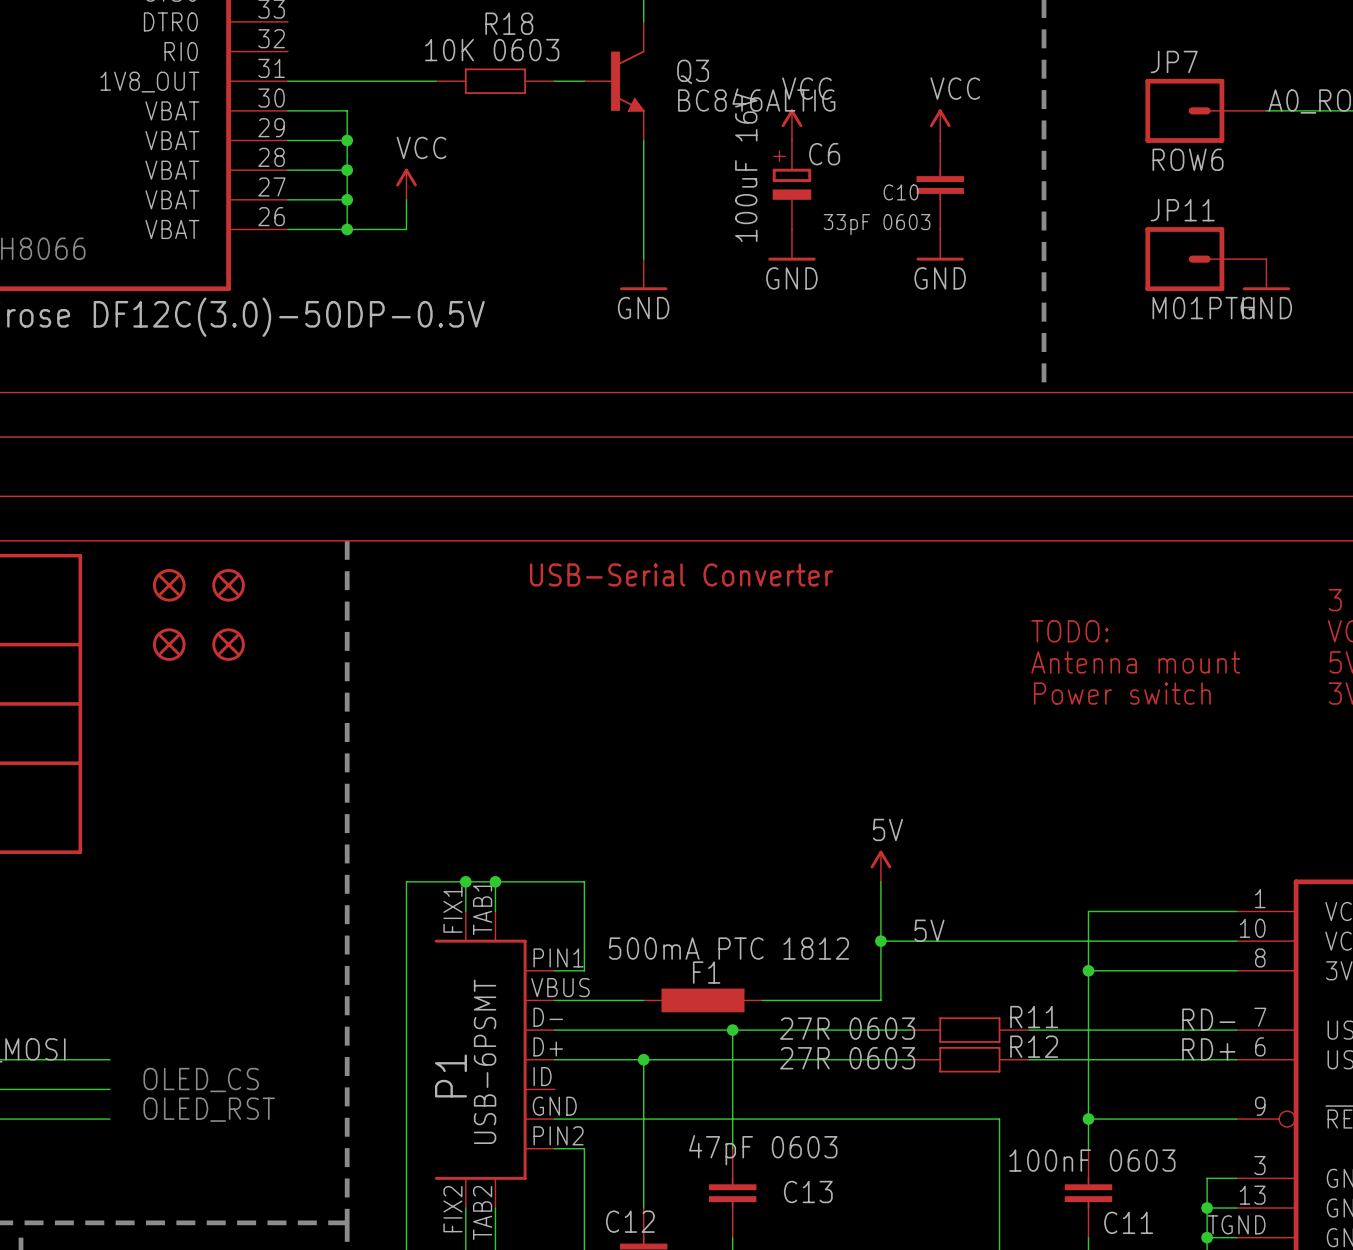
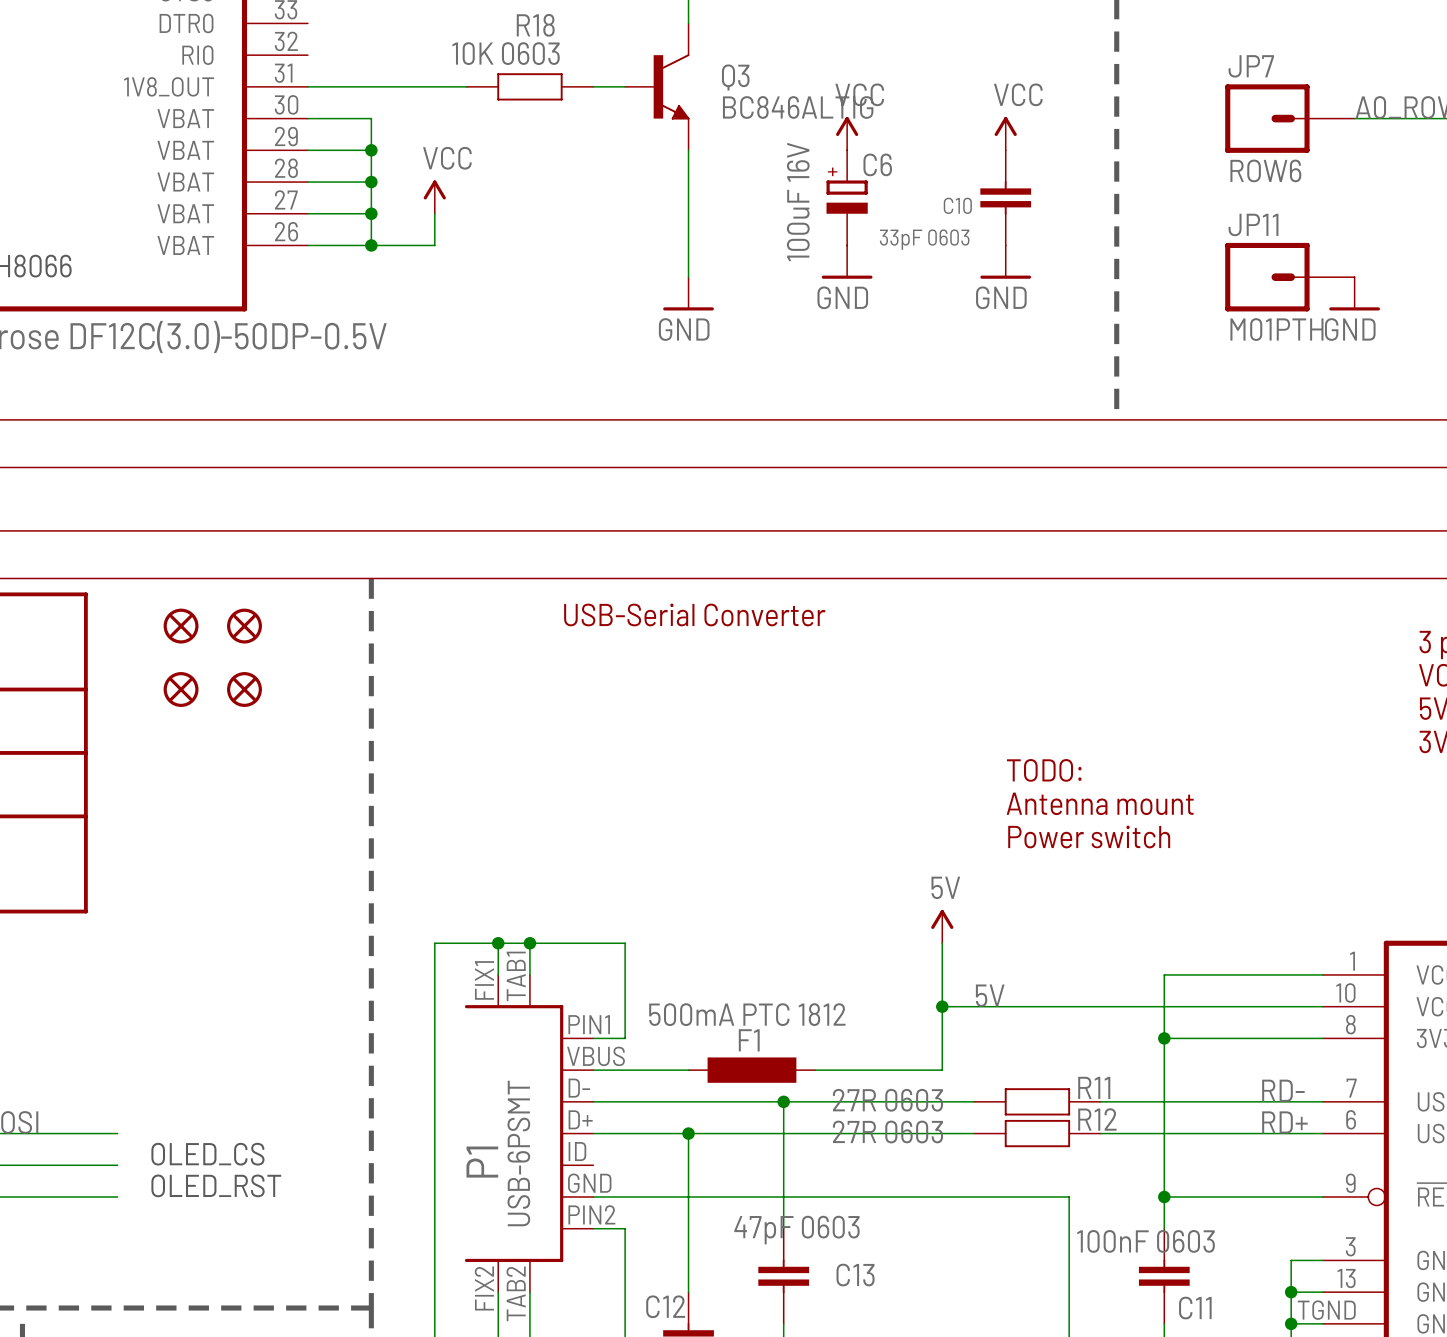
text position: TODO: (1069, 631) -> TODO: (1044, 770)
text position: Antenna mount (1135, 662) -> Antenna mount (1100, 803)
text position: Power switch (1122, 693) -> Power switch (1089, 836)

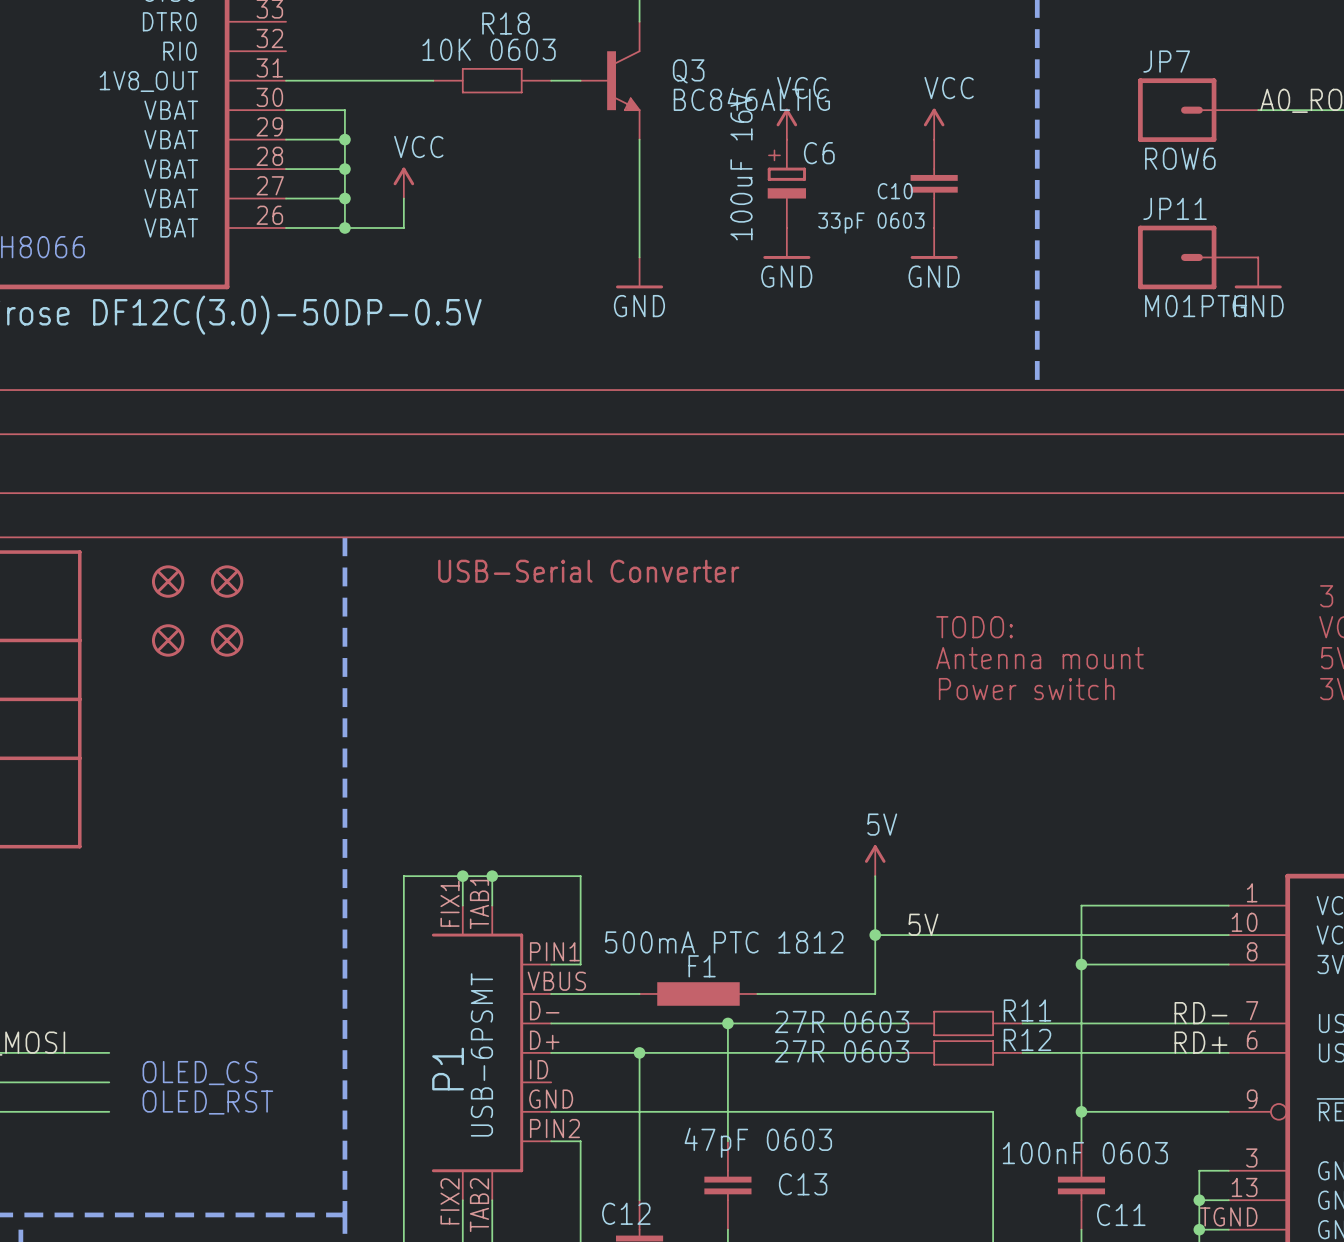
text position: USB-Serial Converter (694, 614) -> USB-Serial Converter (588, 571)
text position: TODO: (1044, 770) -> TODO: (974, 627)
text position: Antenna mount (1100, 803) -> Antenna mount (1039, 658)
text position: Power switch (1089, 836) -> Power switch (1026, 689)

